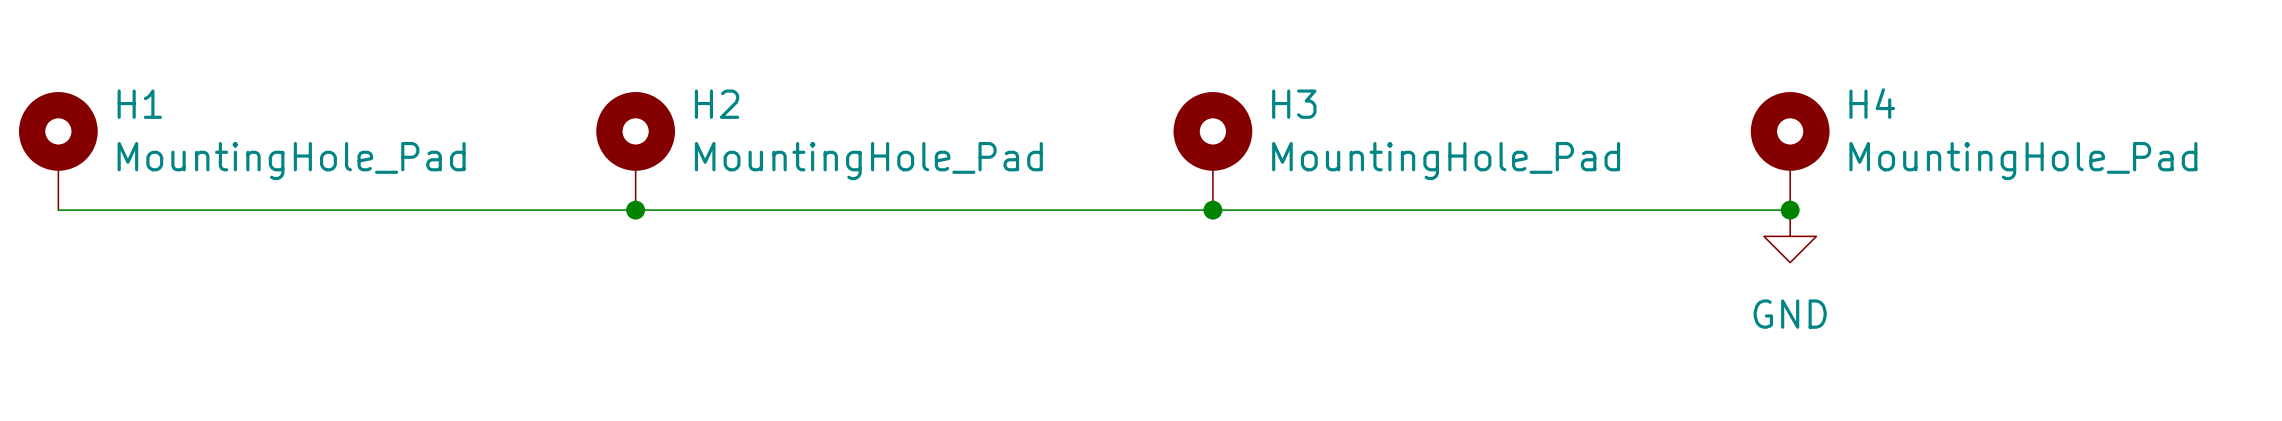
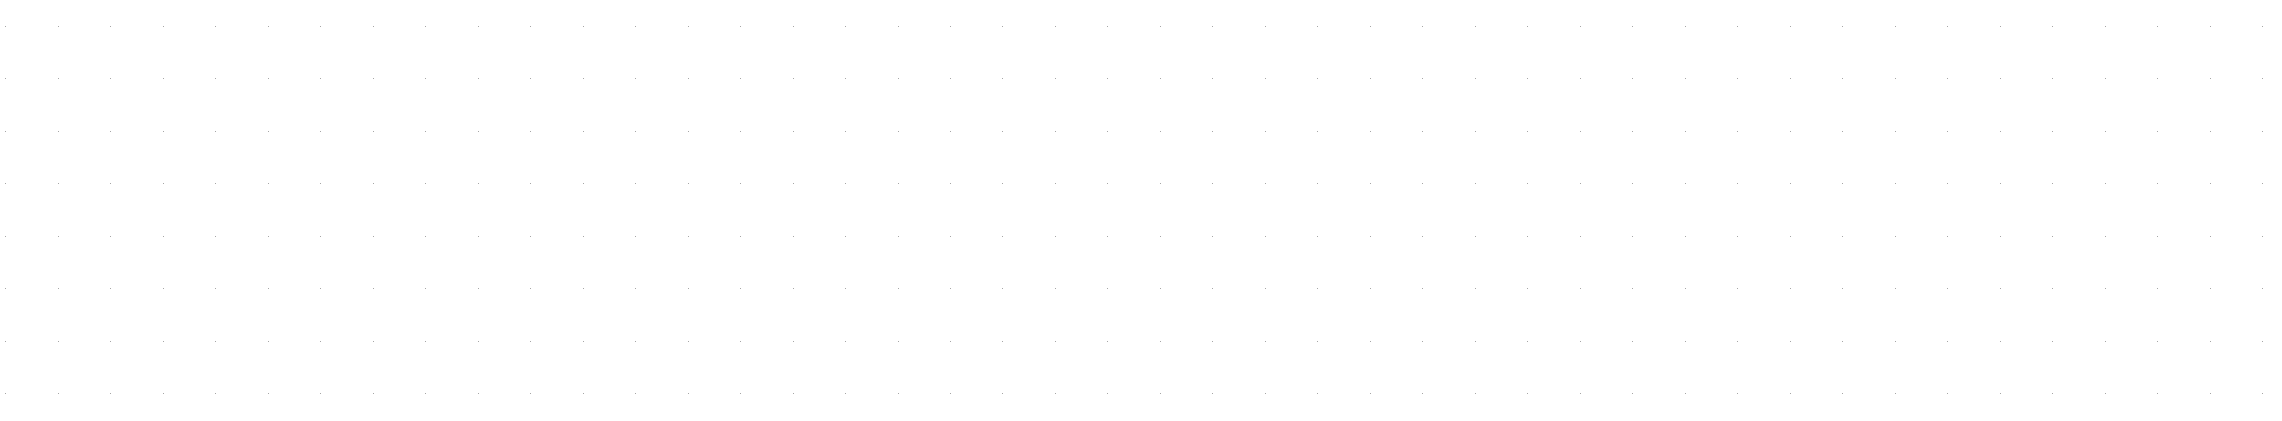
H1: MountingHole_Pad (58, 151) -> none
H2: MountingHole_Pad (635, 151) -> none
H3: MountingHole_Pad (1212, 151) -> none
H4: MountingHole_Pad (1790, 151) -> none
wire: (58, 210) (1790, 210) -> none
junction: (635, 210) -> none
junction: (1212, 210) -> none
junction: (1790, 210) -> none
power symbol: GND (1790, 236) -> none

